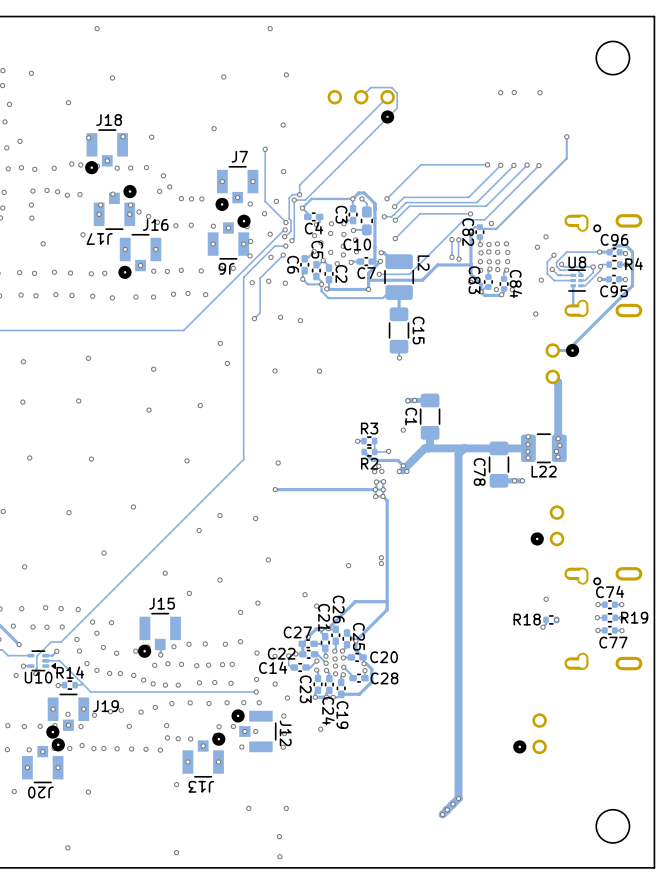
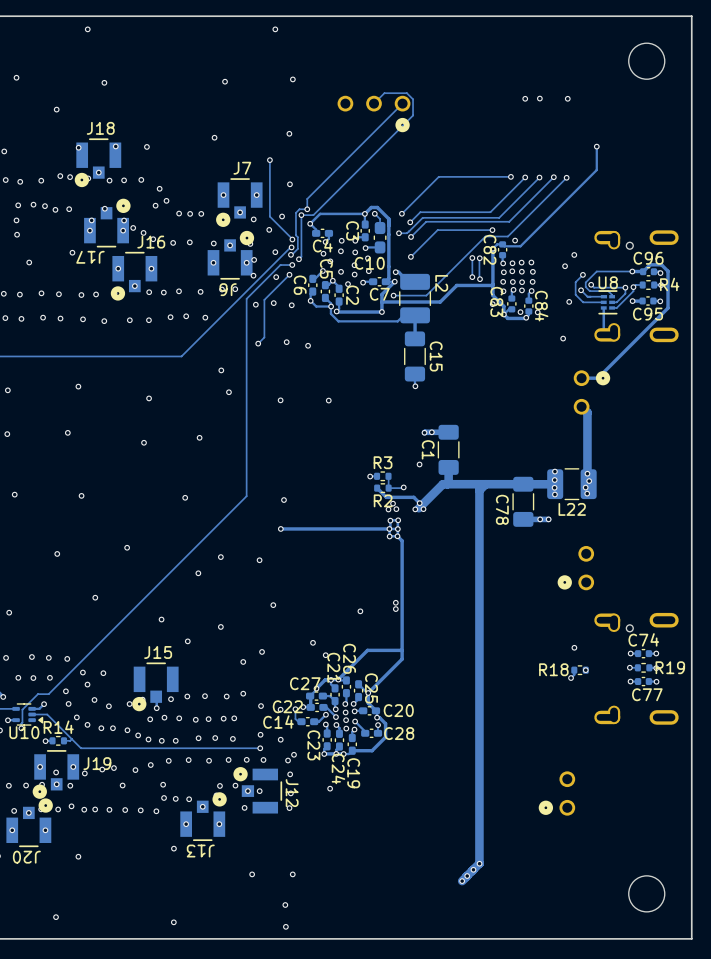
via: none -> (288, 760)

